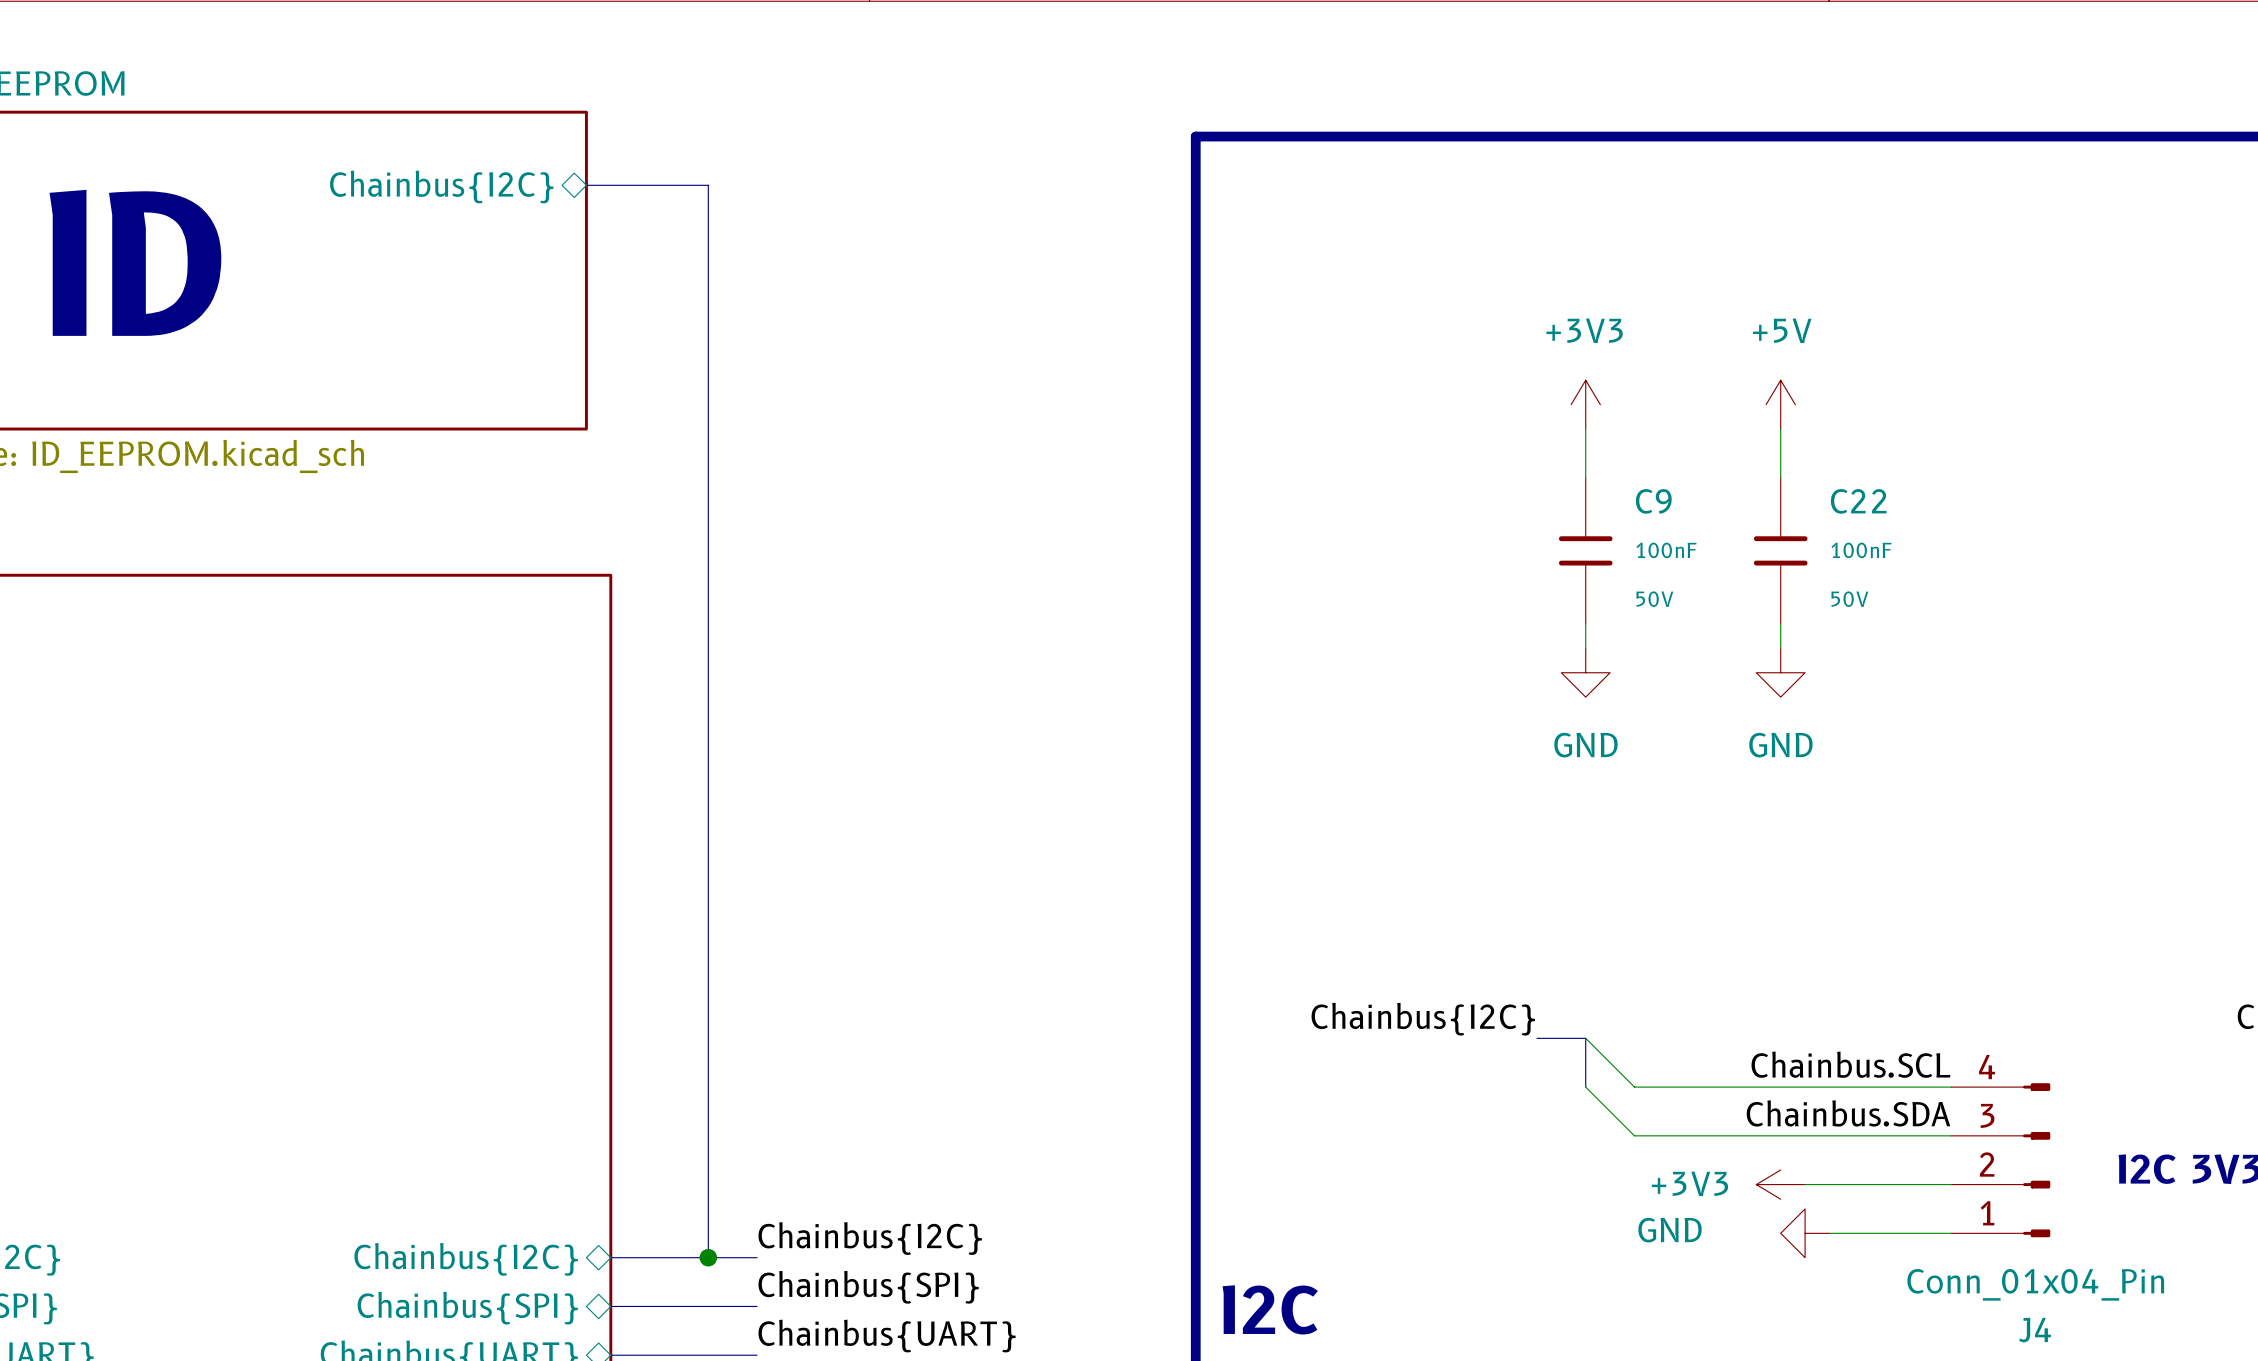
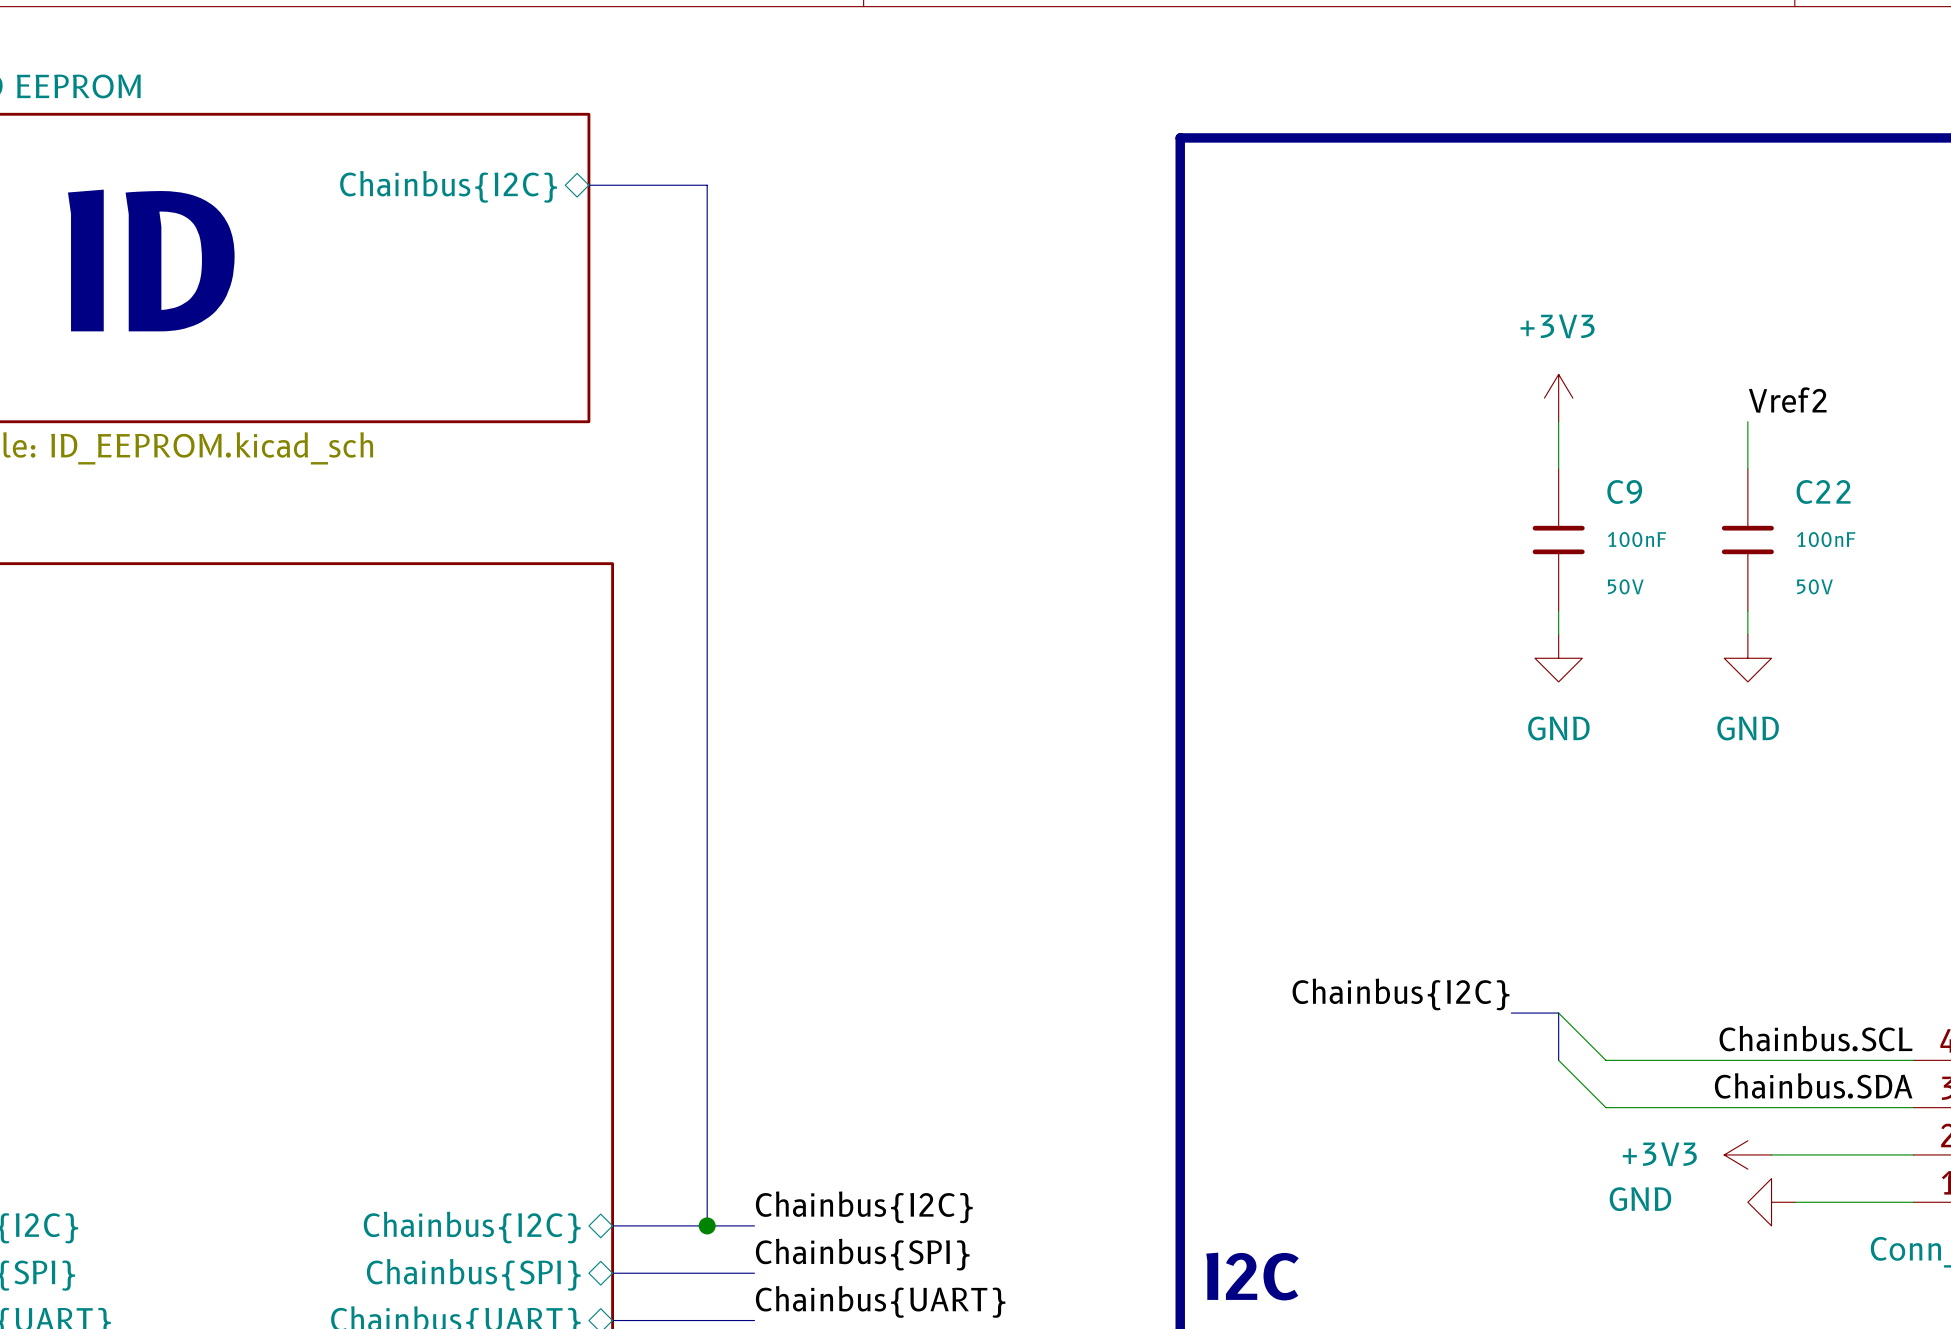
power symbol: +5V (1780, 404) -> none
label: none -> Vref2 (1787, 400)

